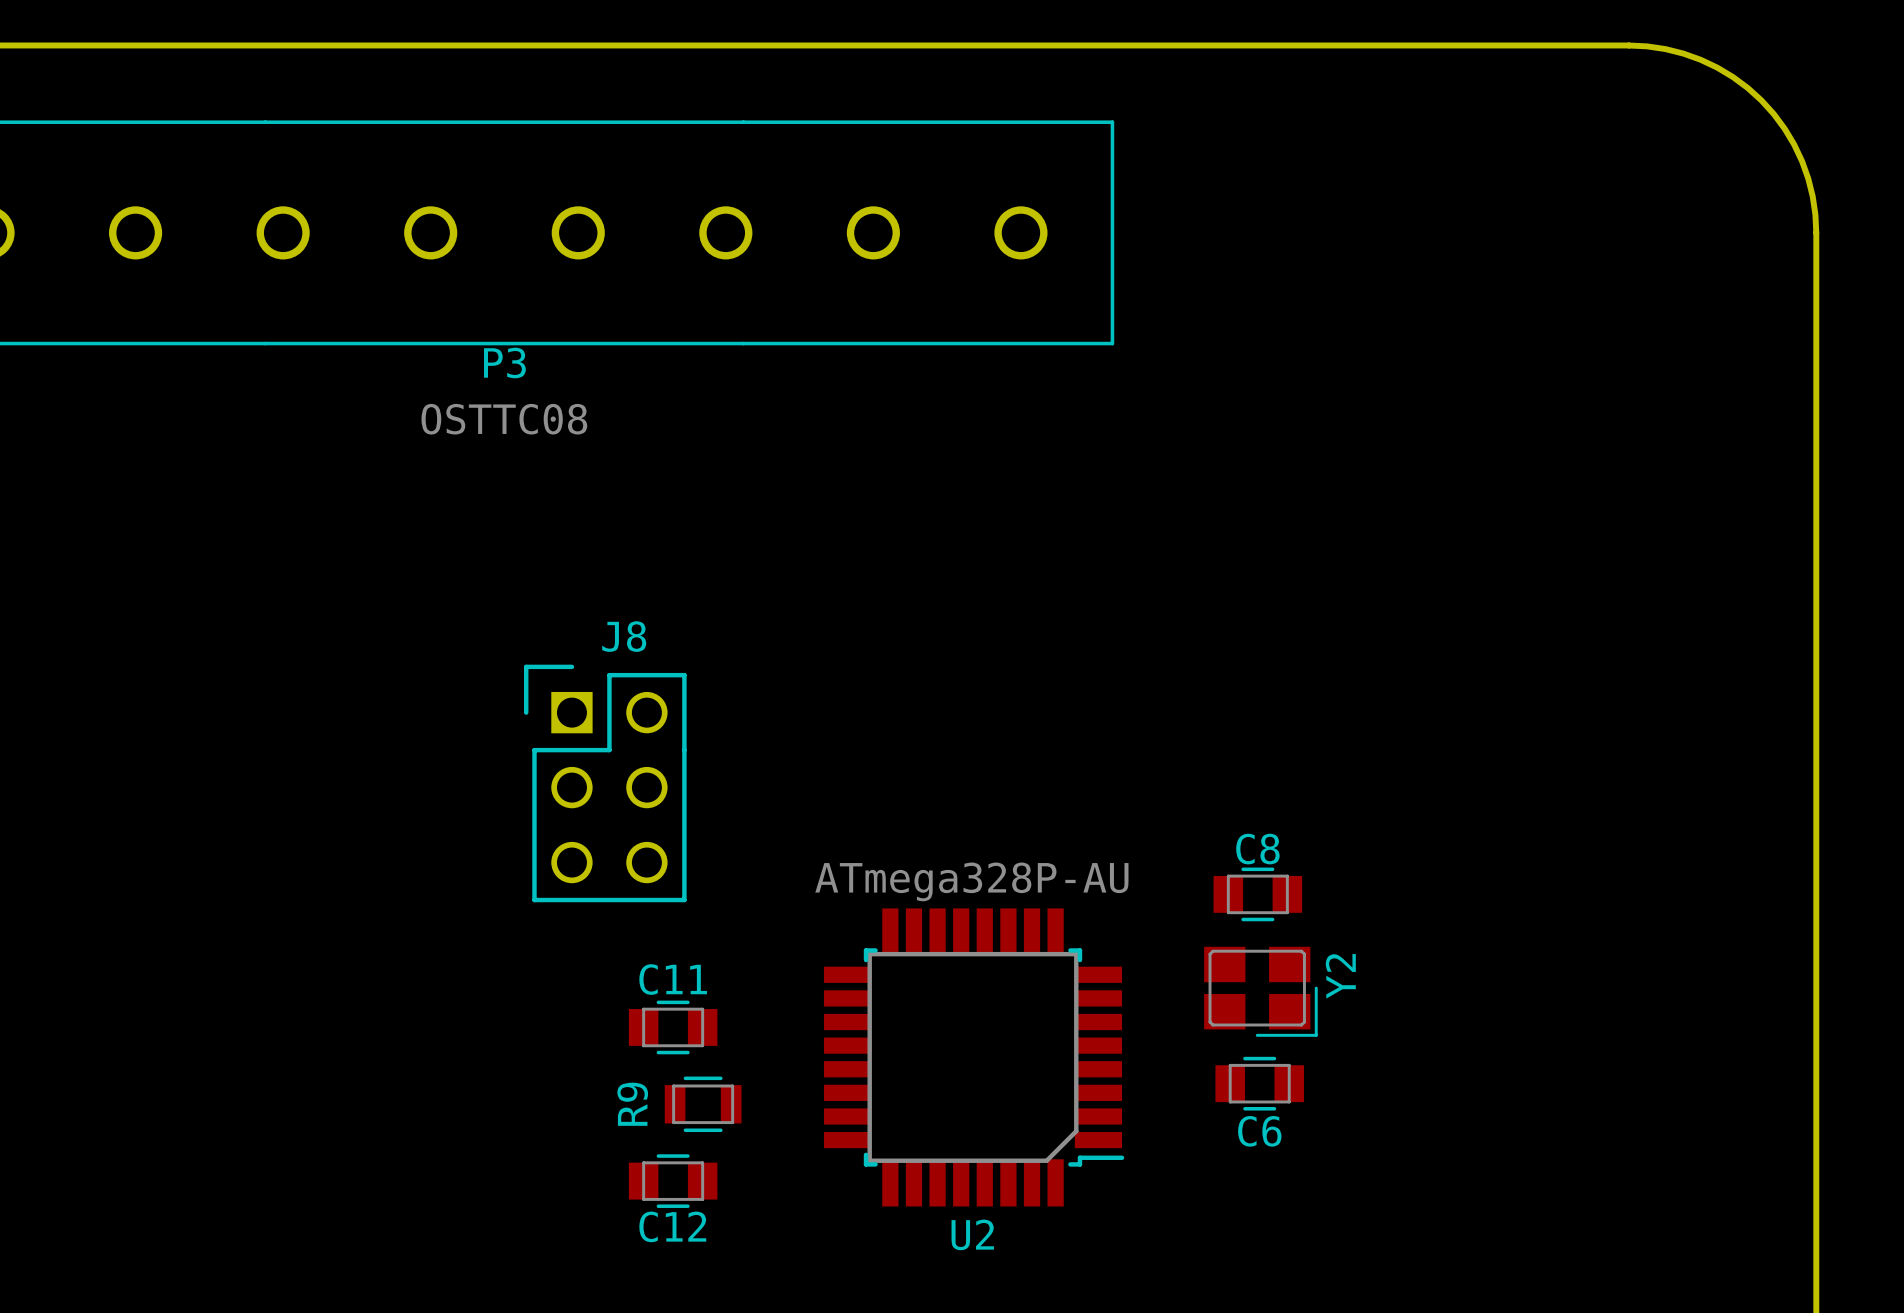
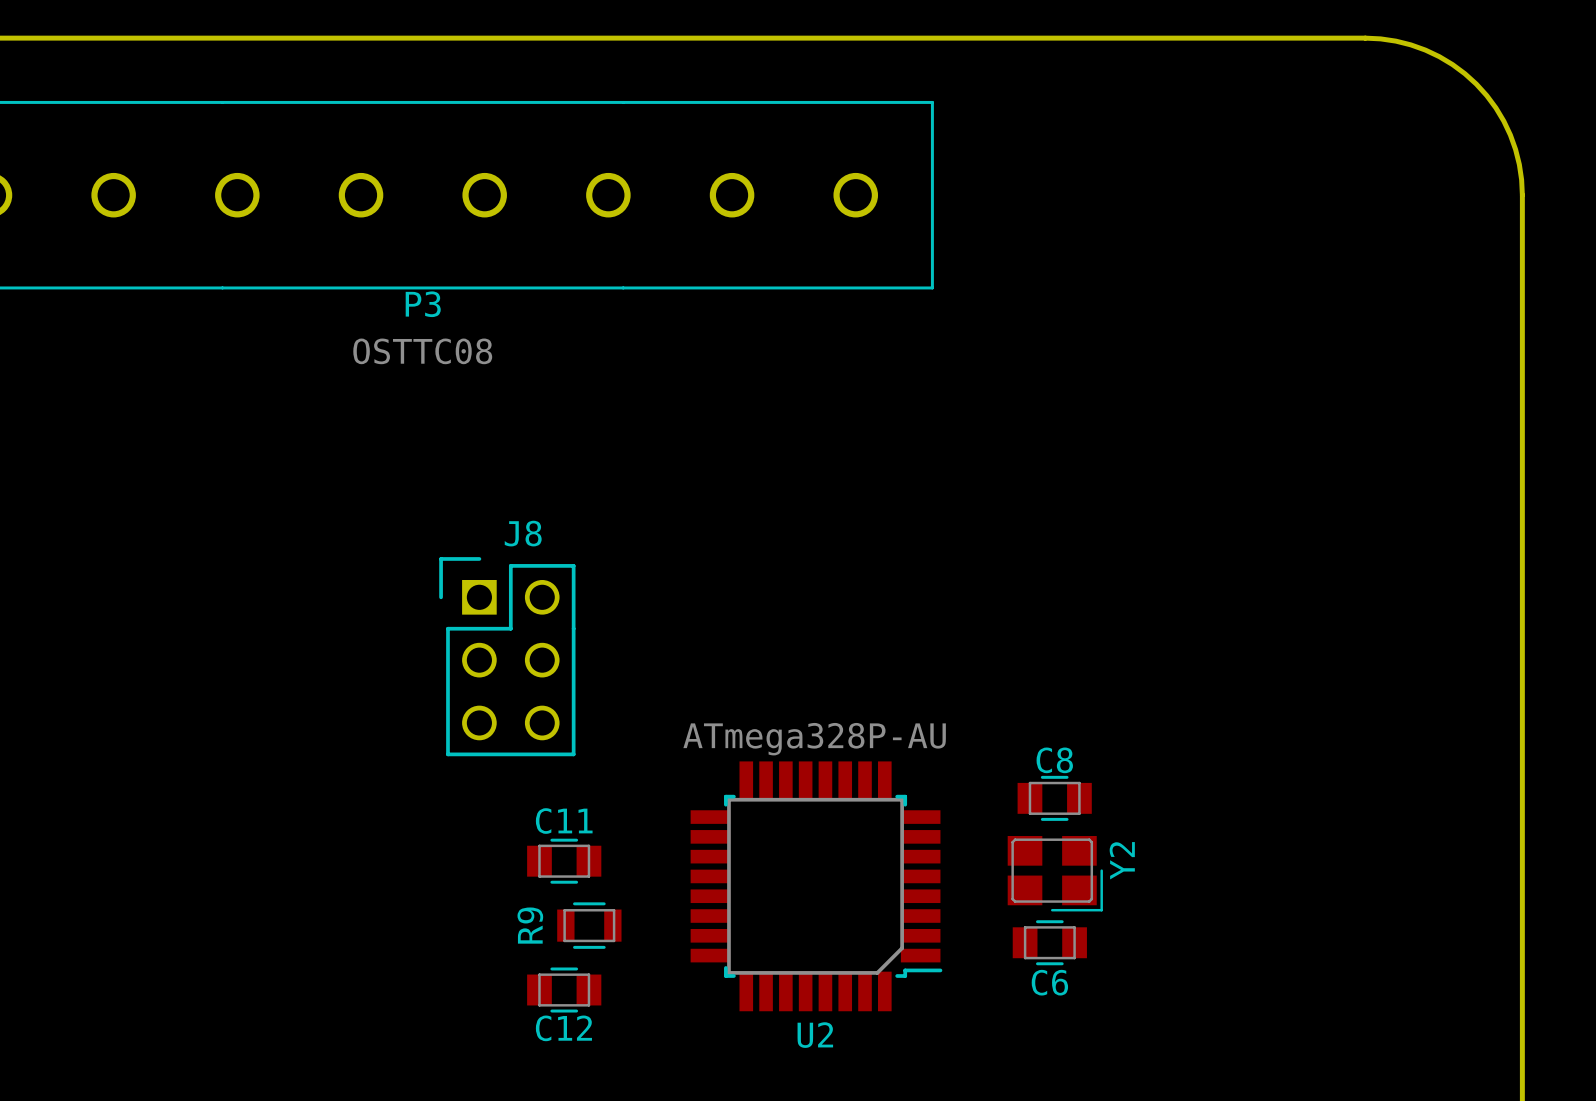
C8 position: (1257, 894) -> (1054, 798)
Y2 position: (1260, 991) -> (1055, 873)
C6 position: (1259, 1083) -> (1049, 942)

